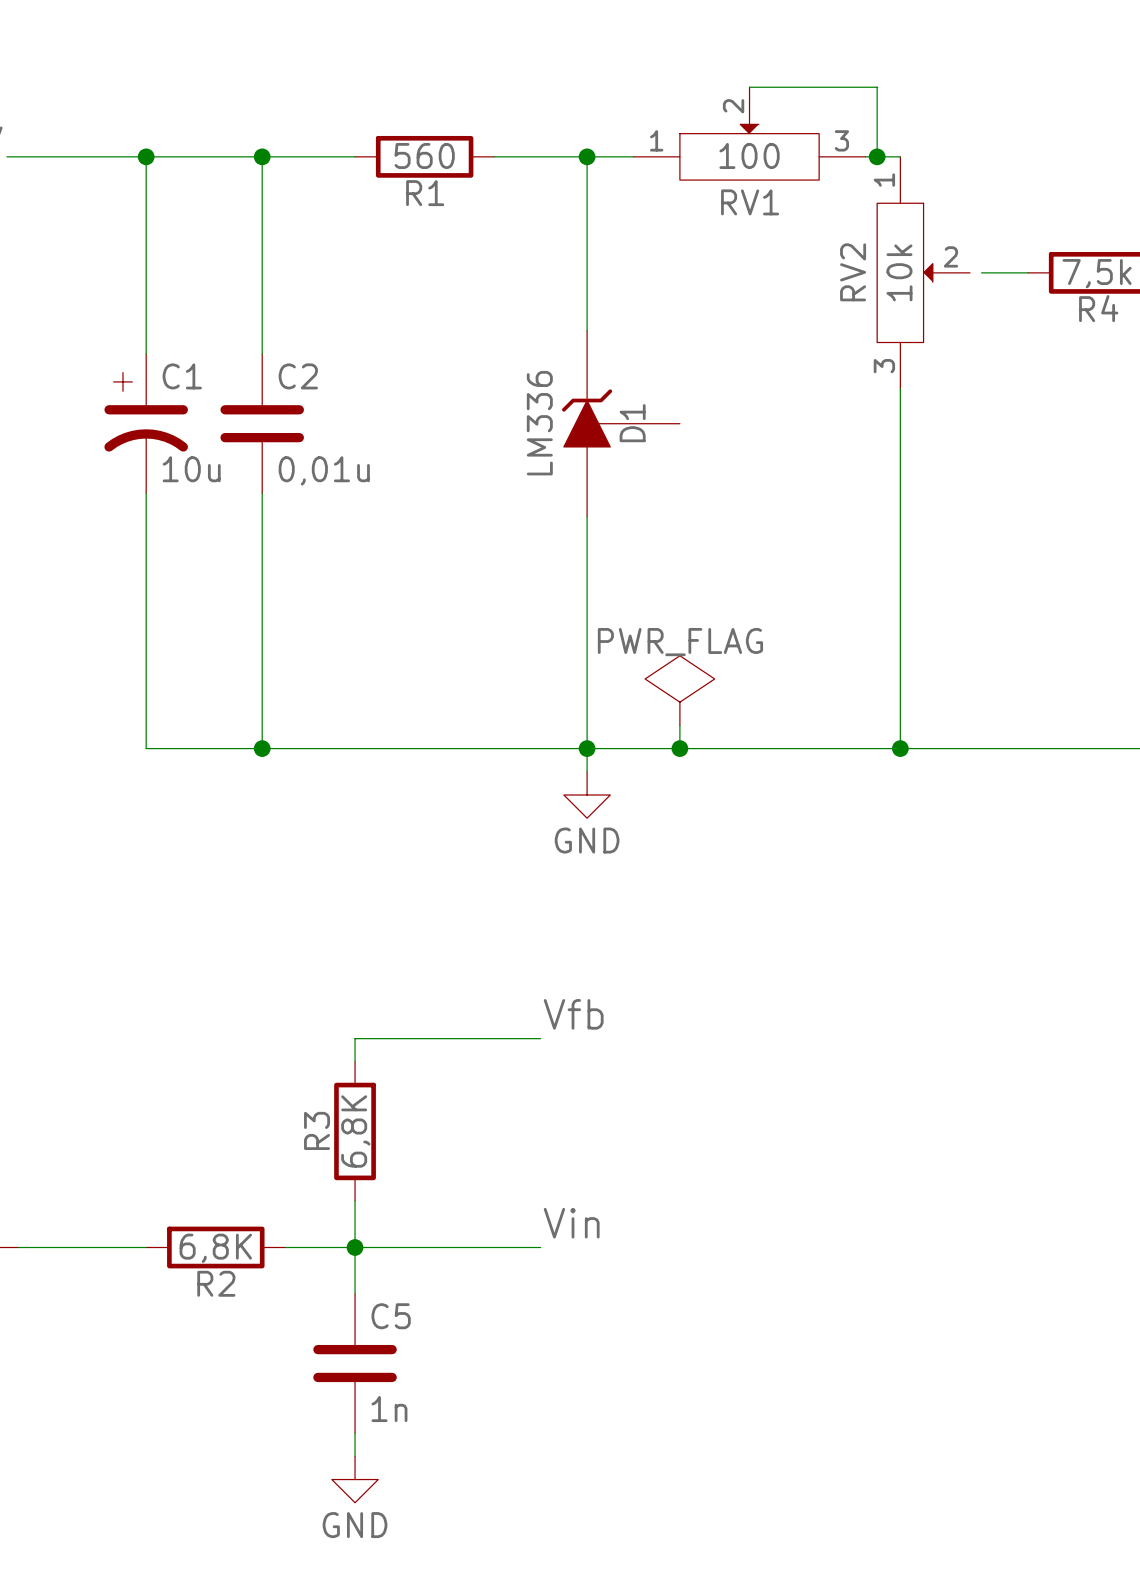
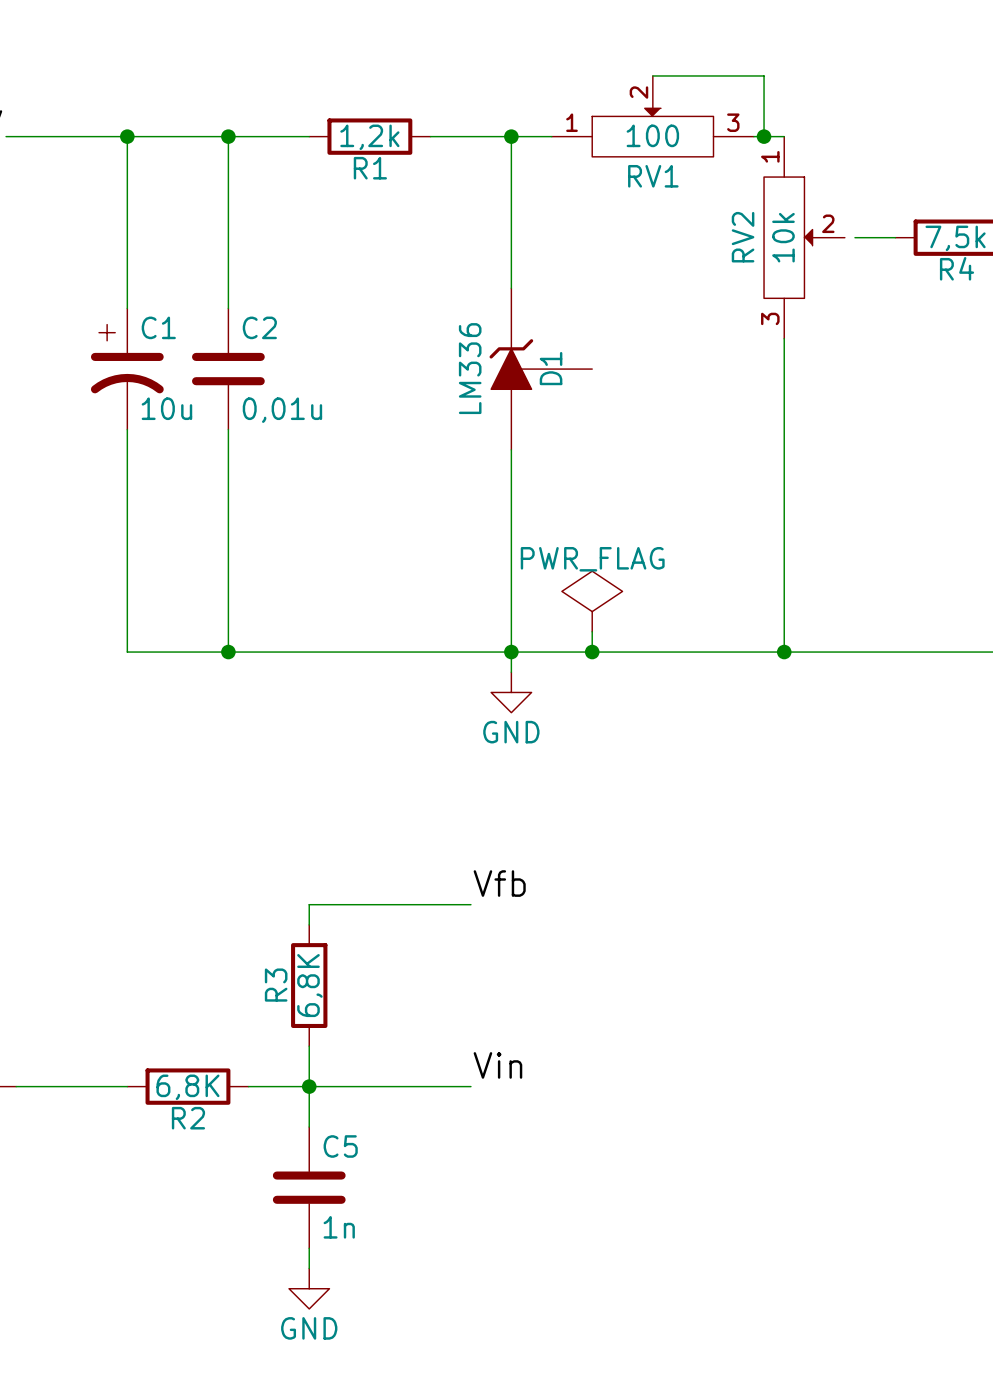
R1 value: 560 (424, 155) -> 1,2k (369, 137)

